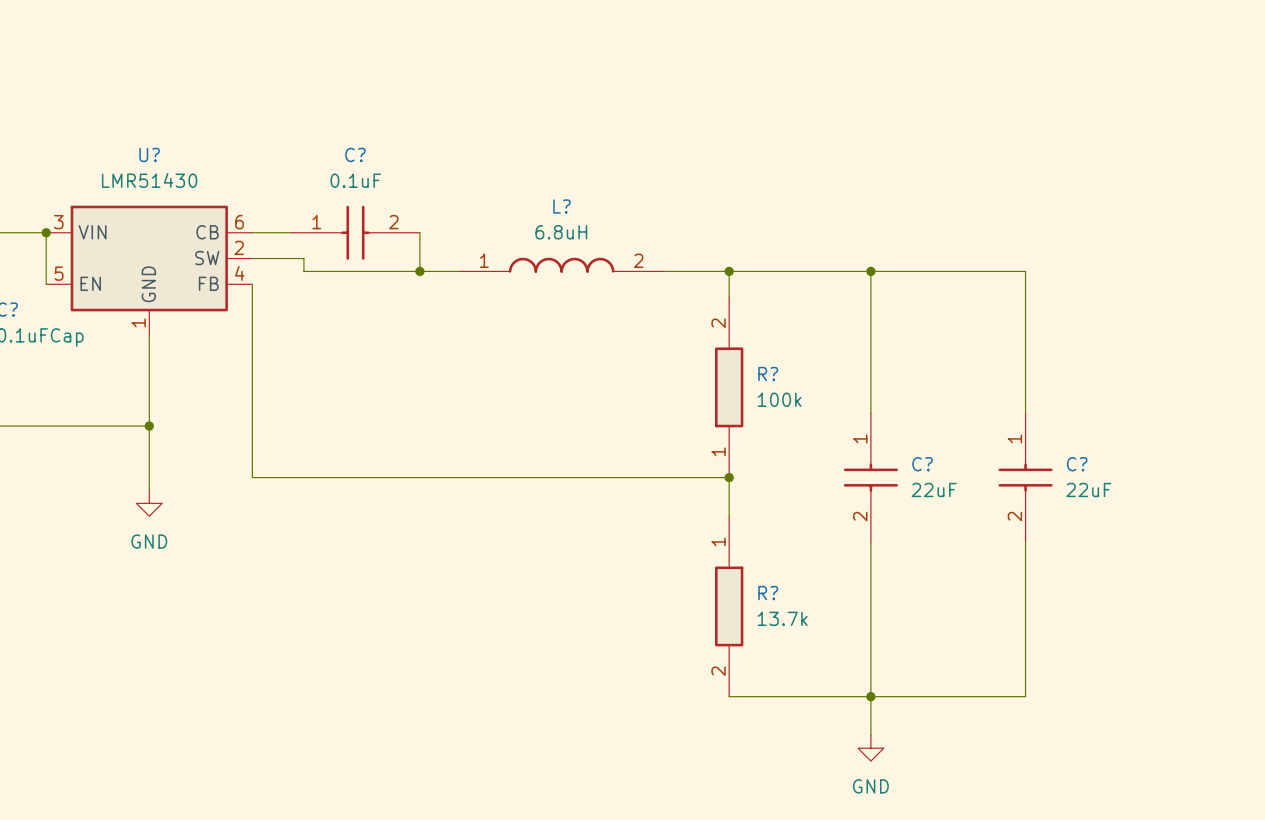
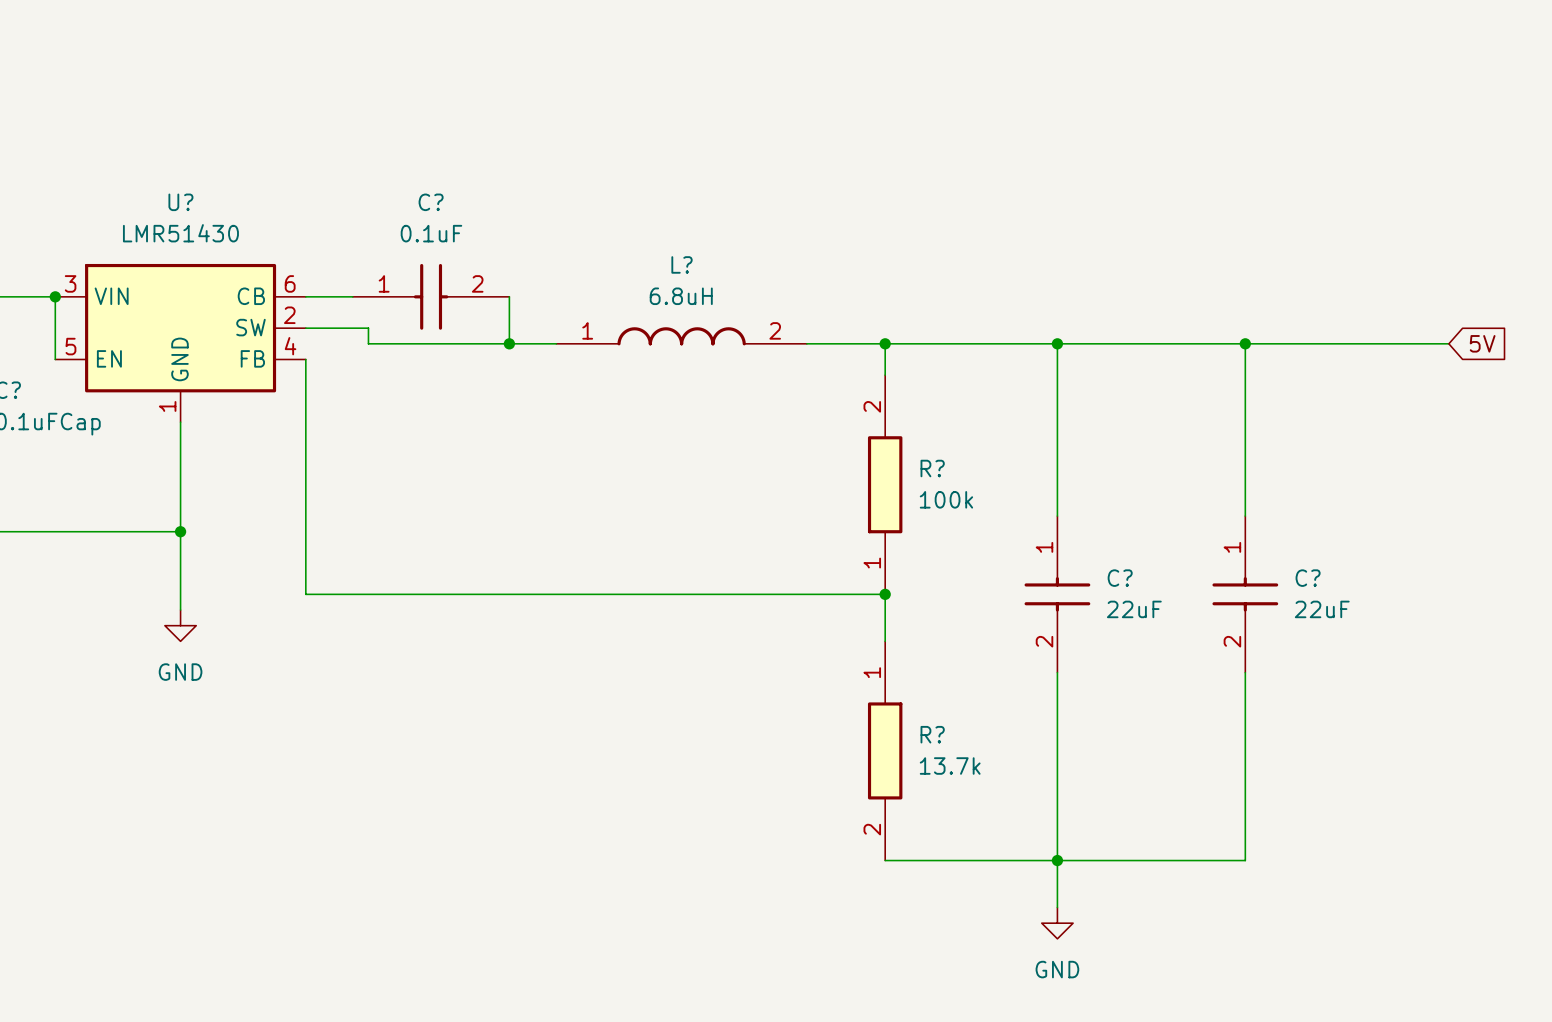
wire: none -> (1245, 343) (1448, 343)
junction: none -> (1245, 343)
global label: none -> 5V (1482, 343)

